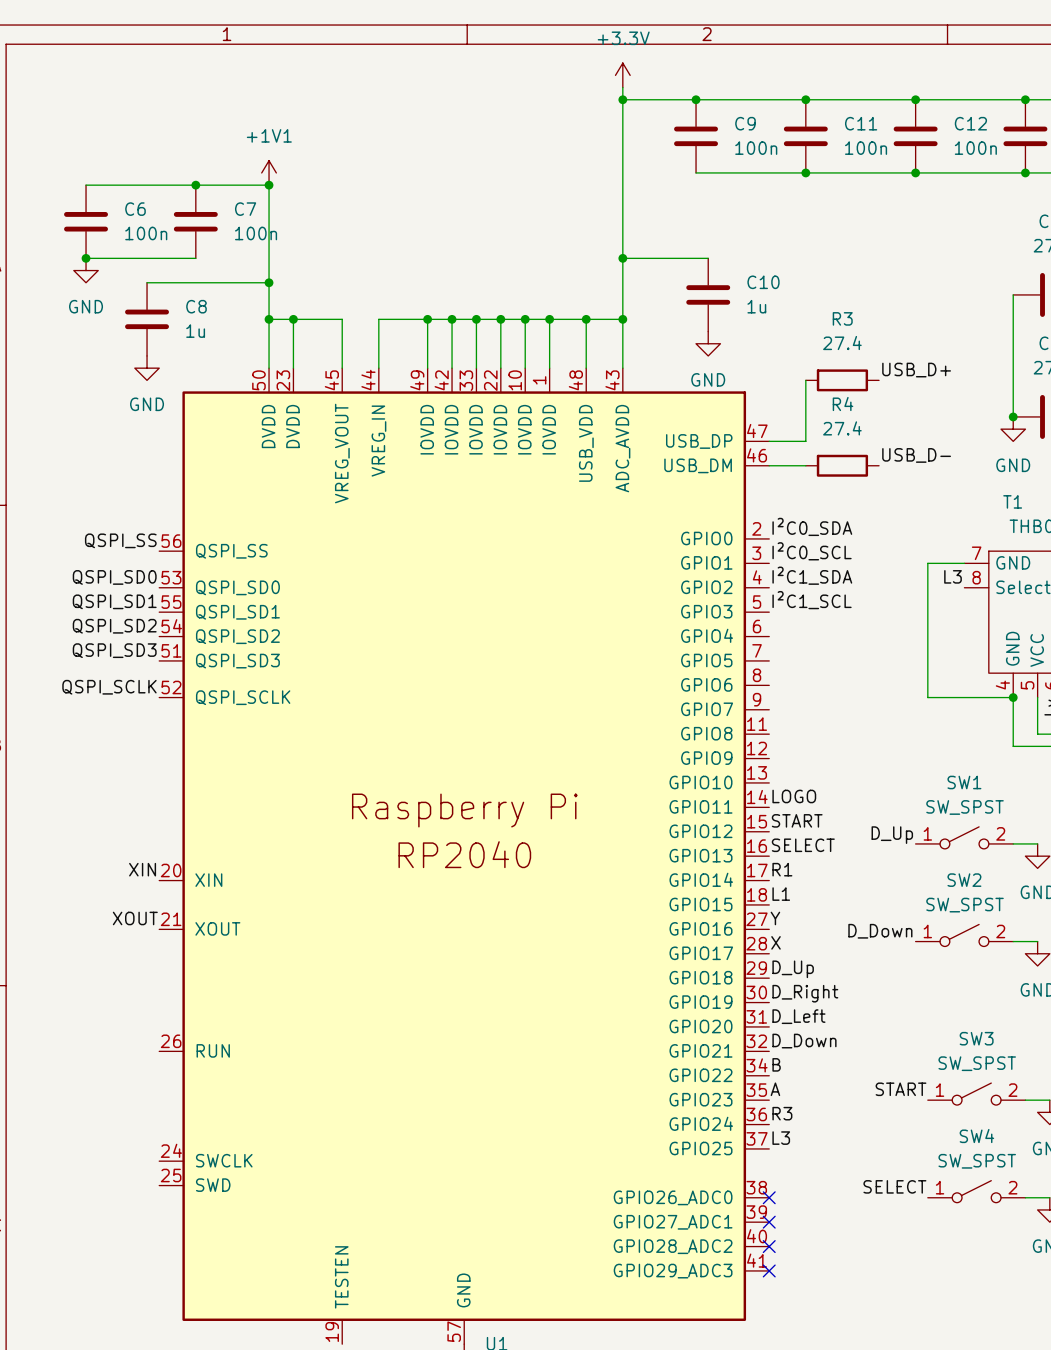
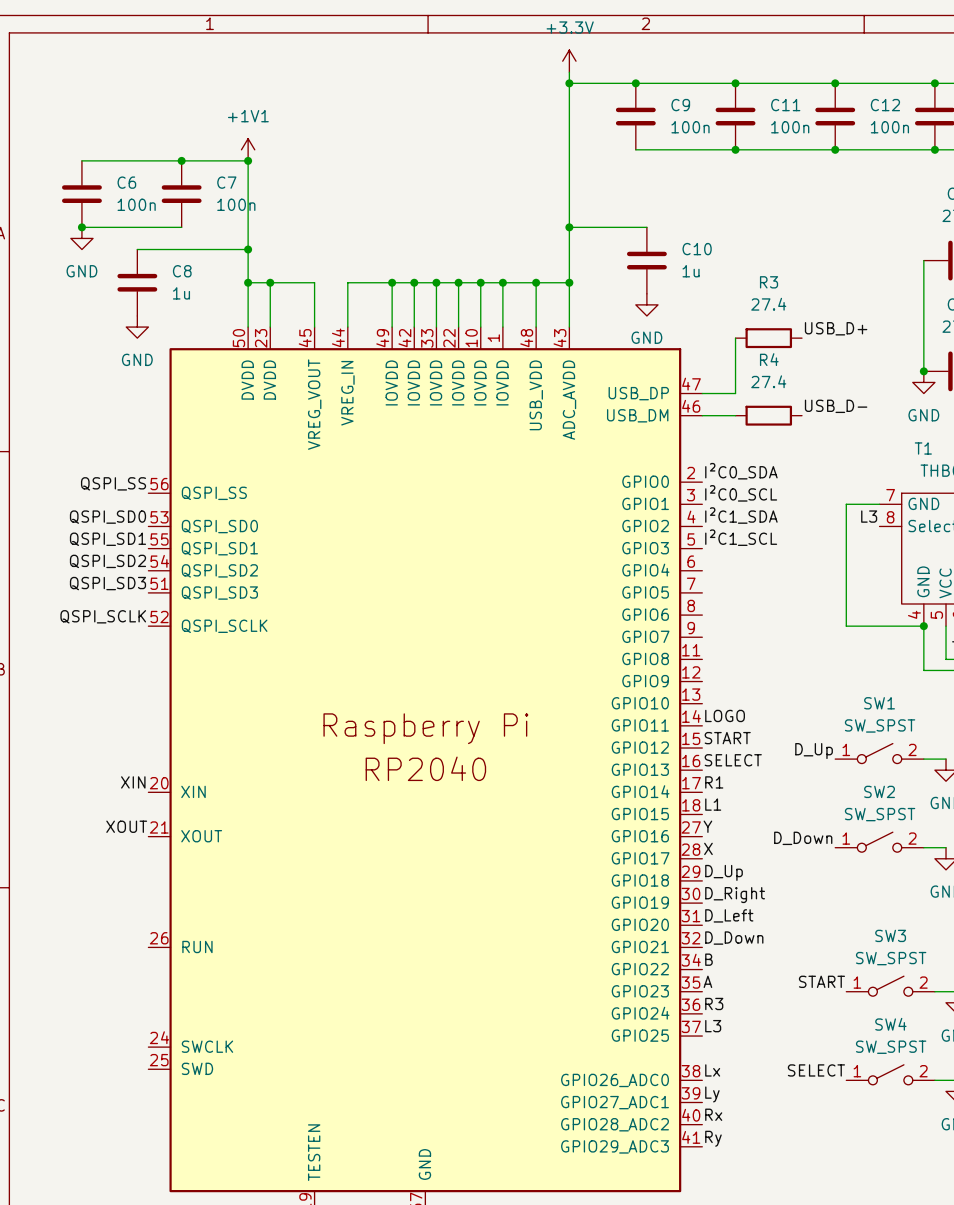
label: none -> Lx (712, 1070)
no-connect mark: (769, 1197) -> none
label: none -> Ly (712, 1094)
no-connect mark: (769, 1222) -> none
label: none -> Rx (713, 1114)
no-connect mark: (769, 1246) -> none
label: none -> Ry (713, 1138)
no-connect mark: (769, 1270) -> none

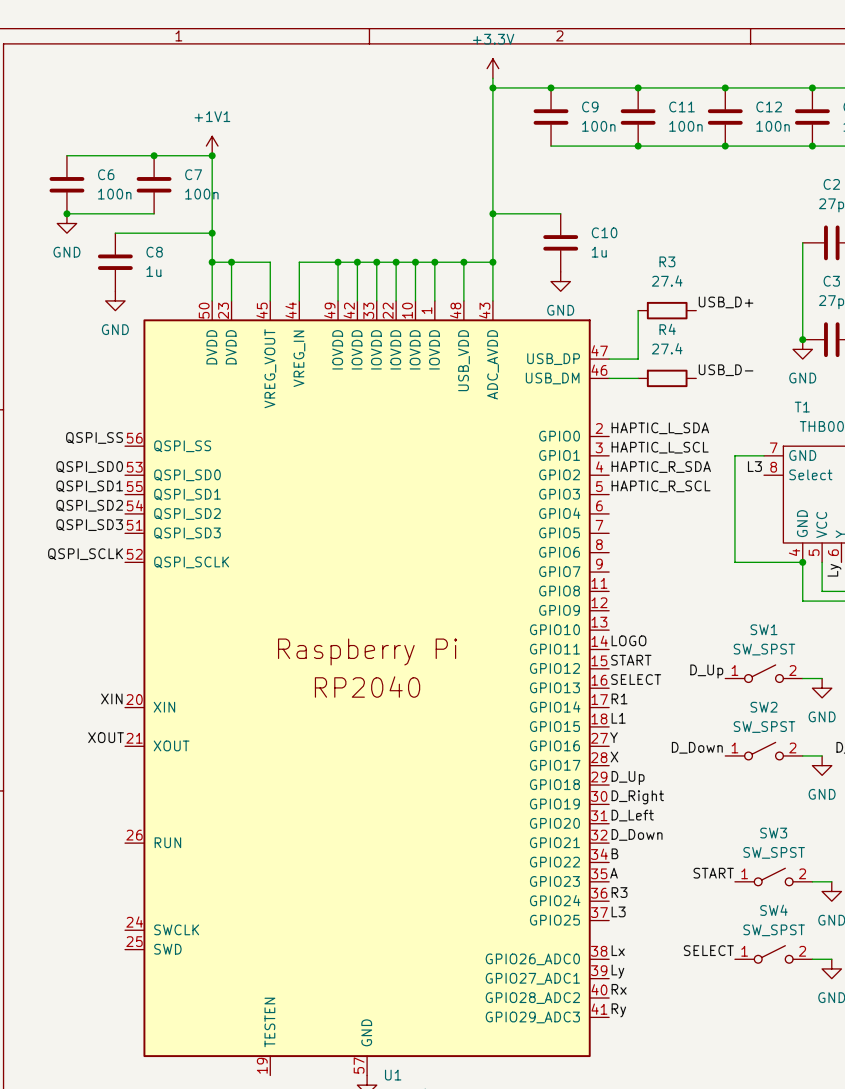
label: I²C0_SDA (741, 471) -> HAPTIC_L_SDA (660, 428)
label: I²C0_SCL (741, 493) -> HAPTIC_L_SCL (660, 447)
label: I²C1_SDA (741, 515) -> HAPTIC_R_SDA (661, 467)
label: I²C1_SCL (741, 537) -> HAPTIC_R_SCL (661, 486)

